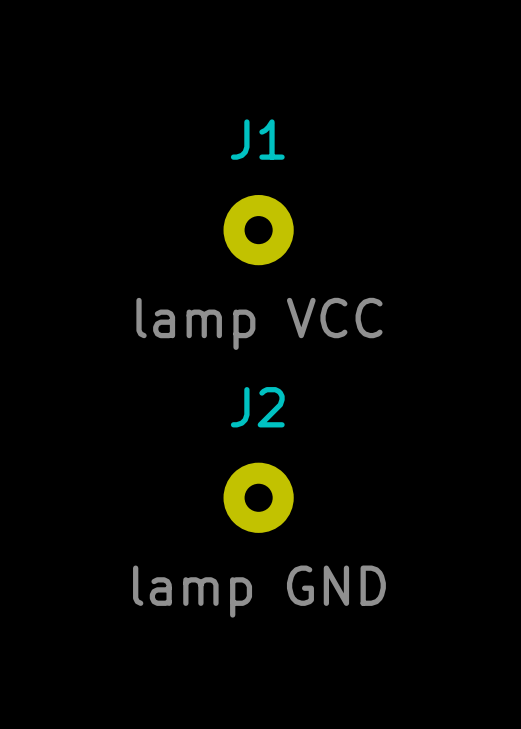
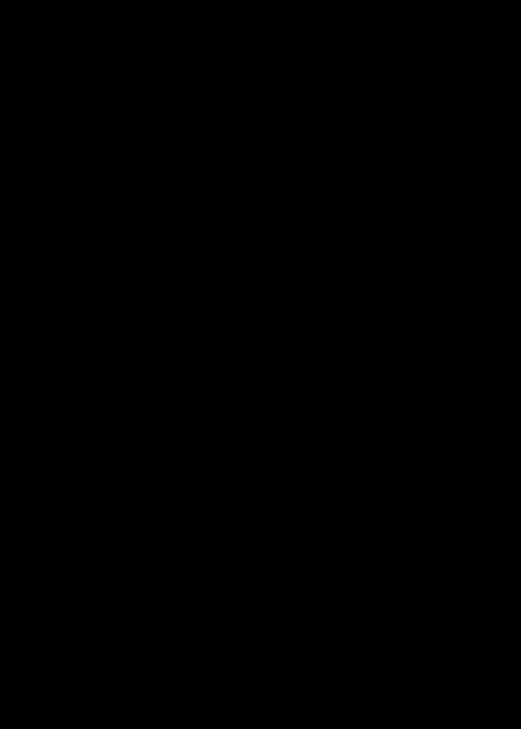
J1: lamp VCC (258, 230) -> none
J2: lamp GND (258, 497) -> none

